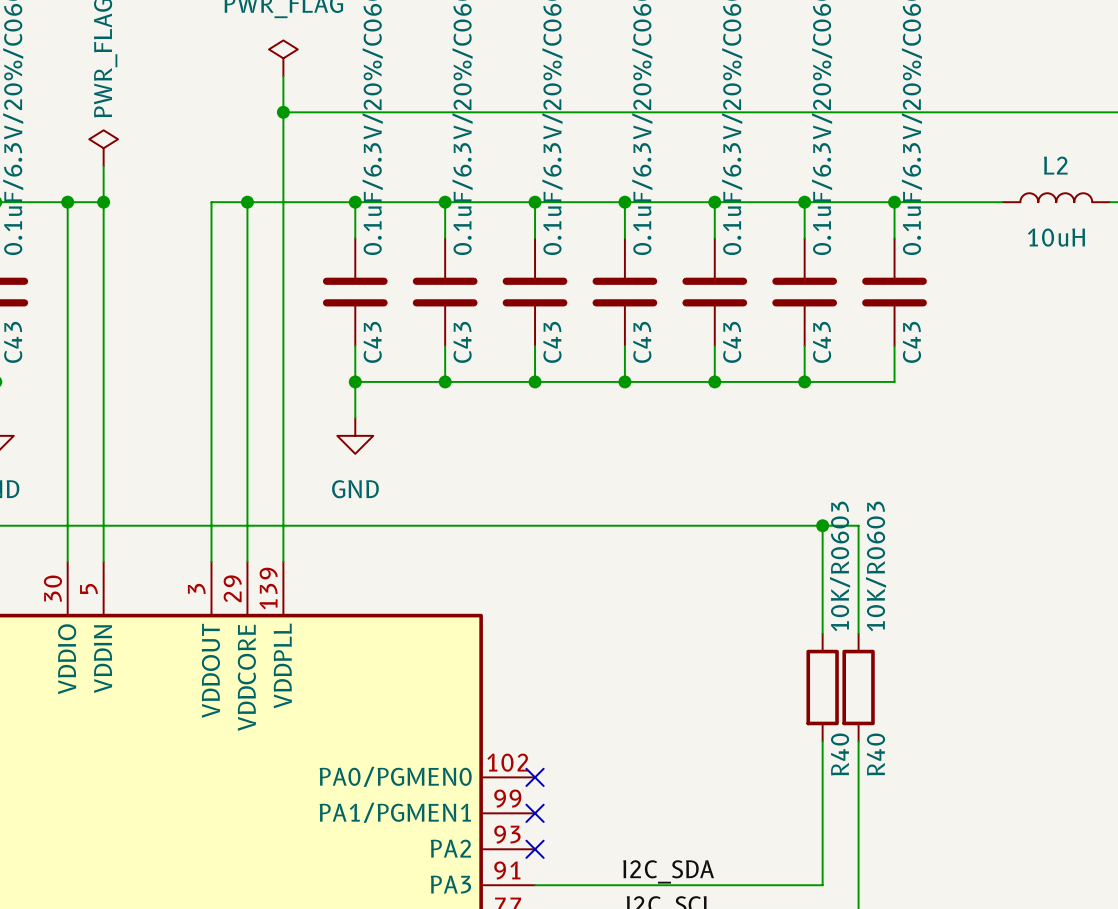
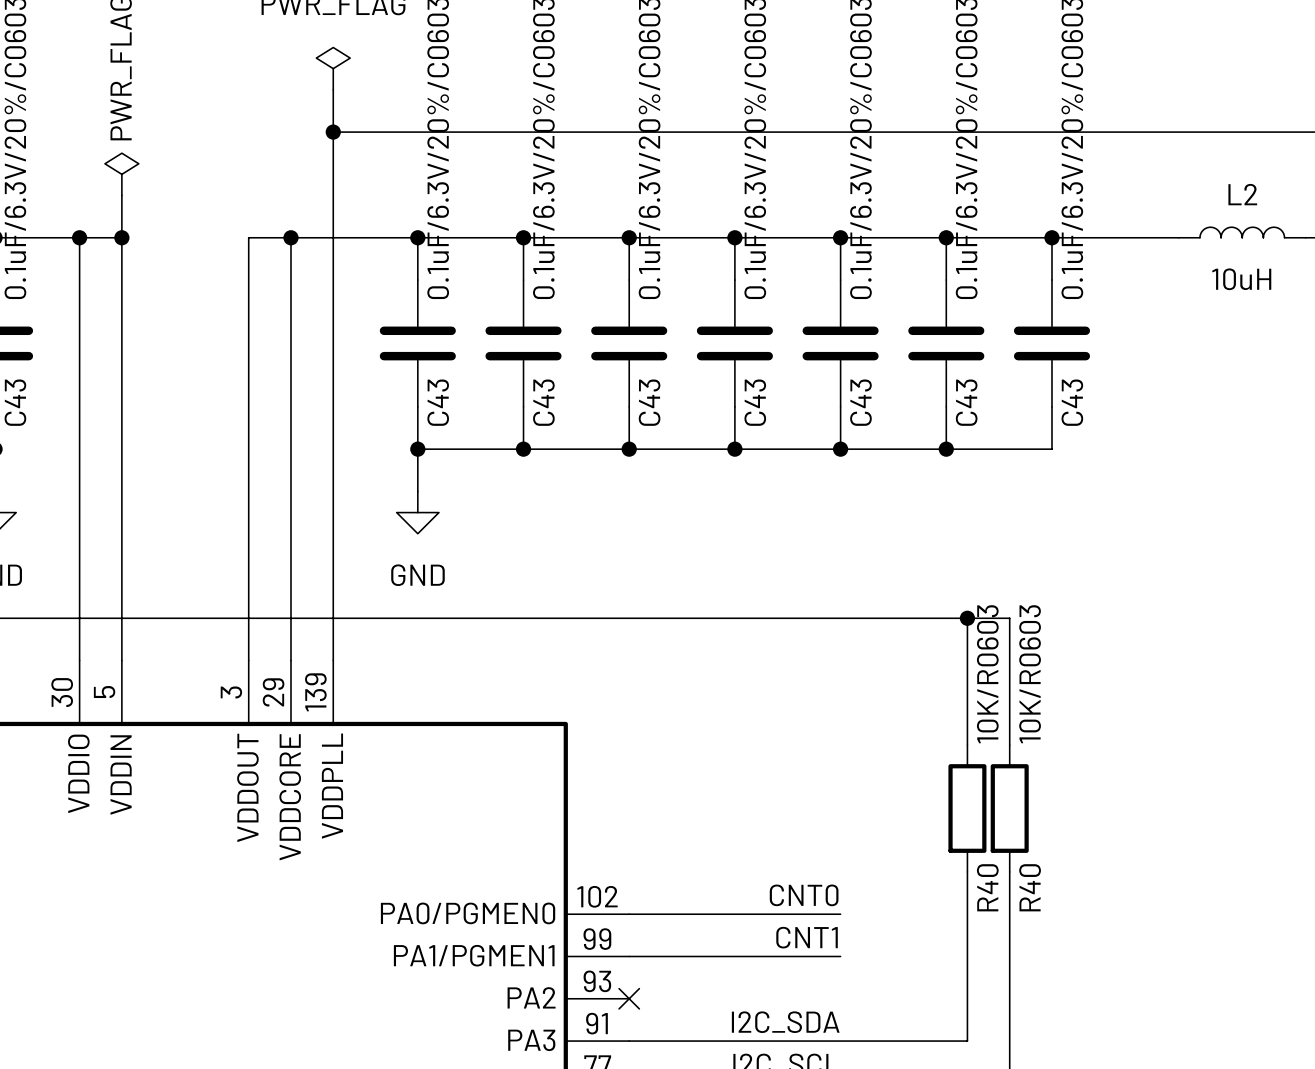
label: none -> CNT0 (804, 895)
wire: none -> (629, 914) (840, 914)
no-connect mark: (535, 777) -> none
label: none -> CNT1 (807, 937)
wire: none -> (629, 956) (840, 956)
no-connect mark: (535, 813) -> none

